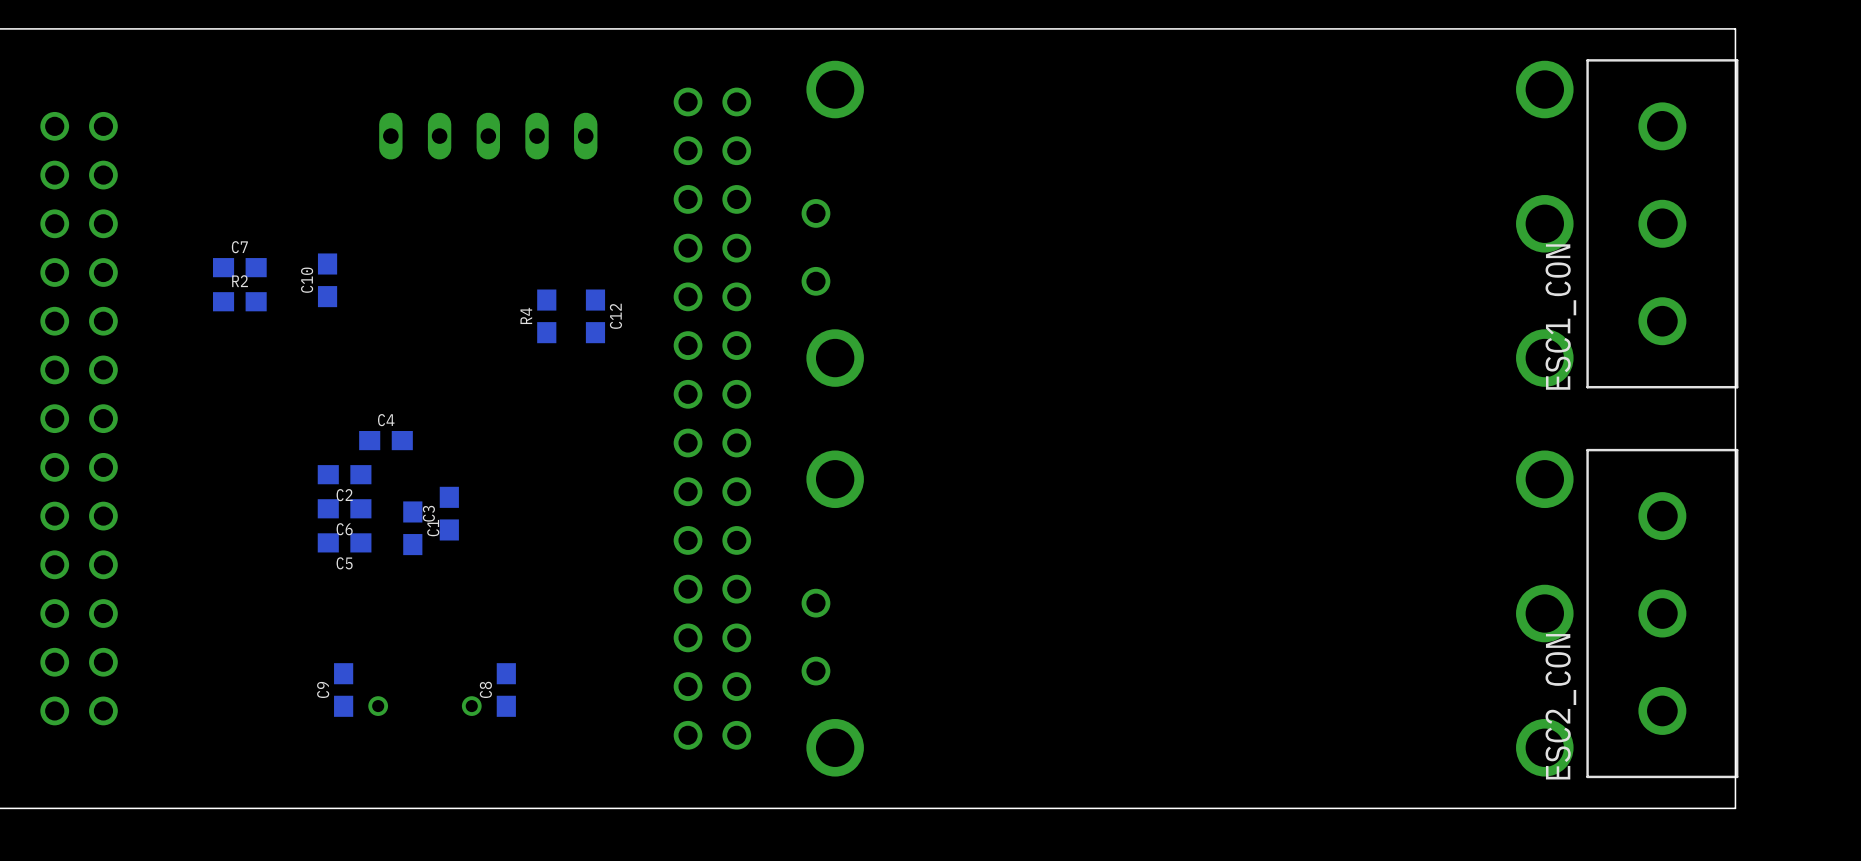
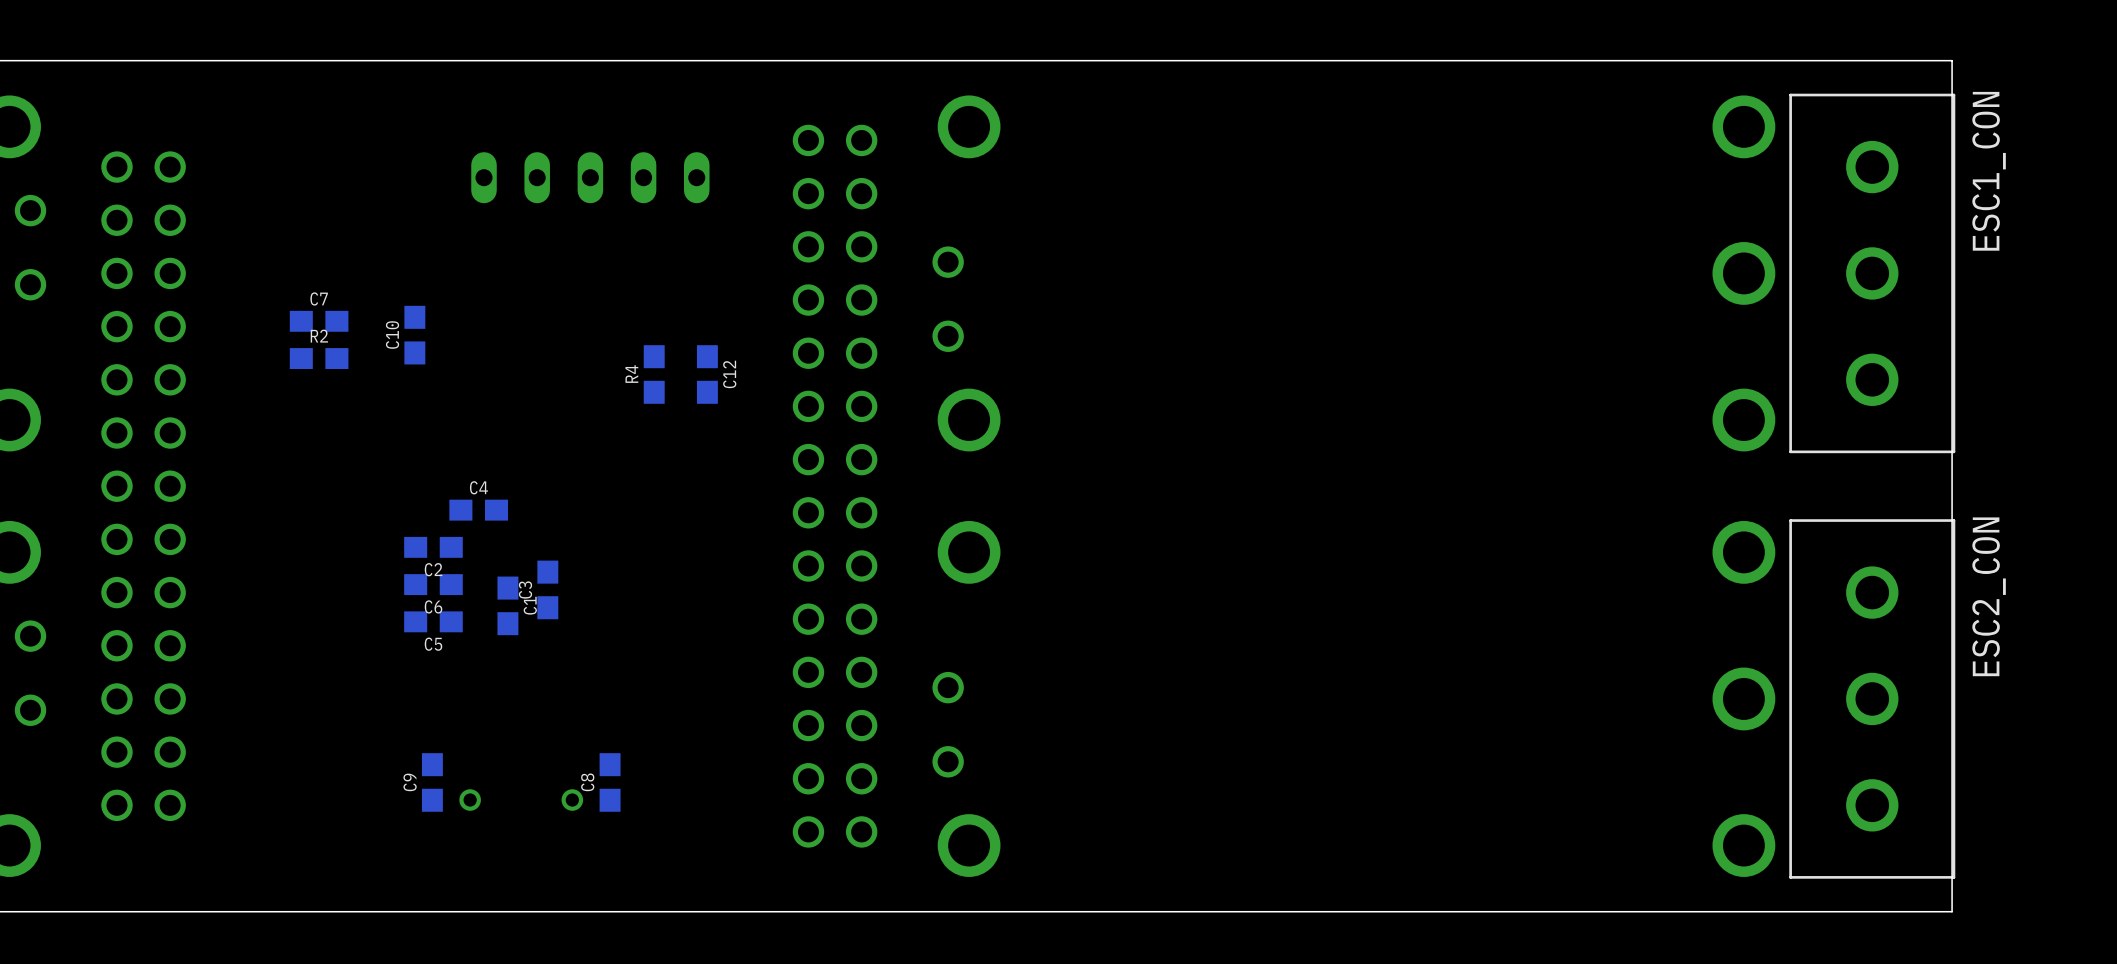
ESC1_CON name position: ESC1_CON (1560, 317) -> ESC1_CON (1989, 171)
ESC2_CON name position: ESC2_CON (1560, 706) -> ESC2_CON (1989, 596)

